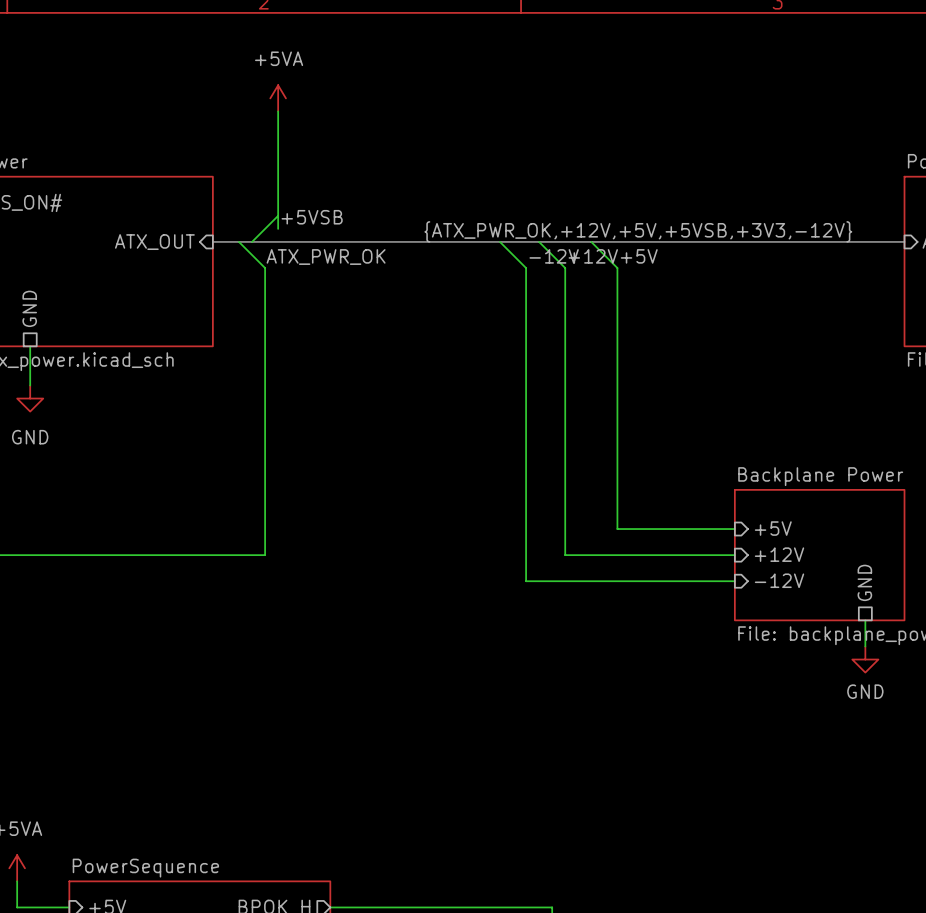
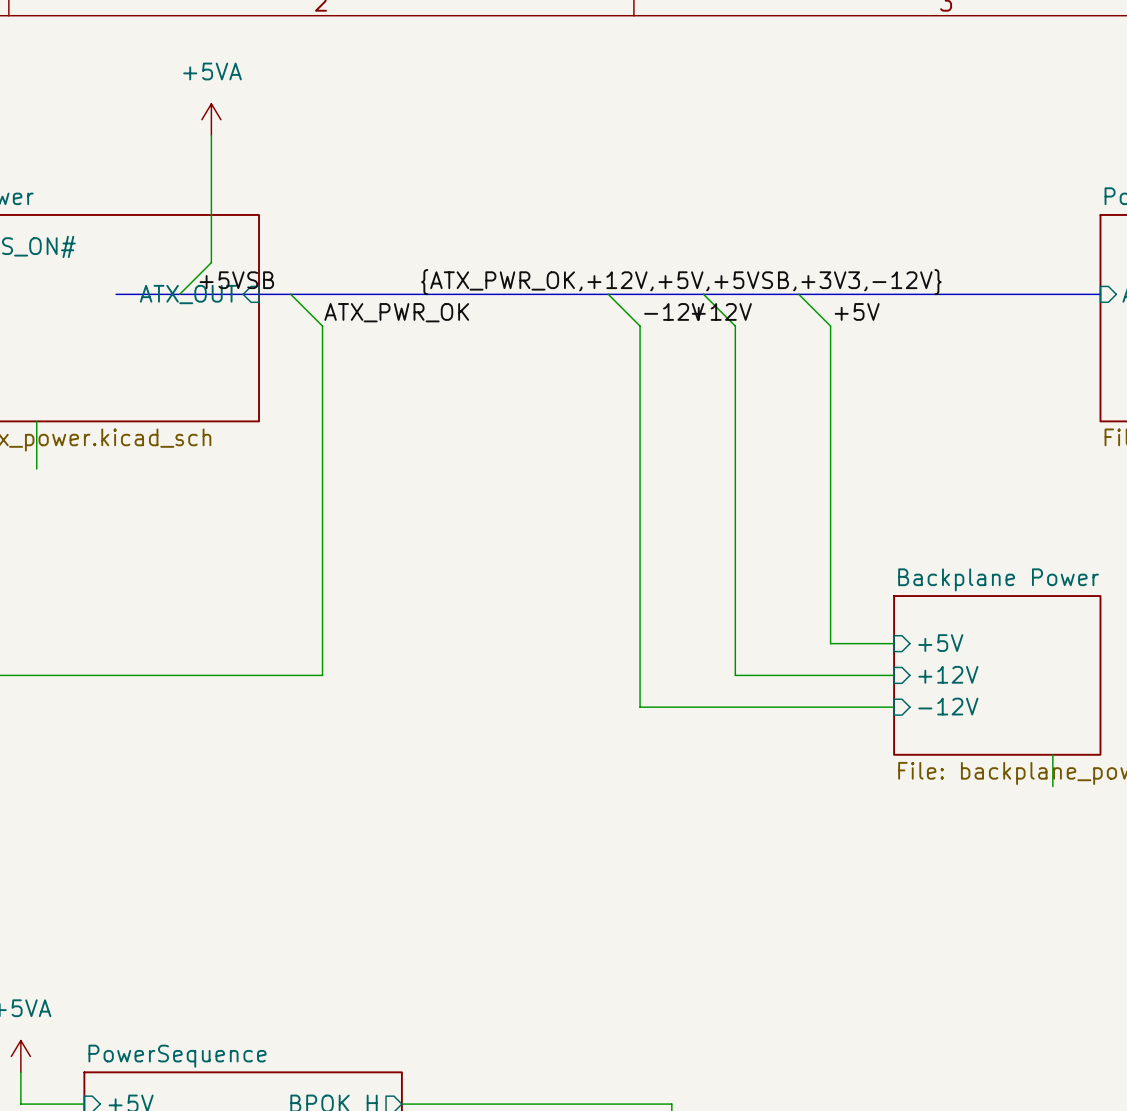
power symbol position: +5VA (278, 98) -> +5VA (211, 119)
wire: none -> (211, 135) (211, 262) (179, 294)
wire: (278, 111) (278, 228) -> none
wire: (278, 215) (252, 241) -> none
label position: +5VSB (312, 217) -> +5VSB (236, 280)
label position: {ATX_PWR_OK,+12V,+5V,+5VSB,+3V3,-12V} (638, 231) -> {ATX_PWR_OK,+12V,+5V,+5VSB,+3V3,-12V} (681, 282)
bus: none -> (116, 294) (259, 294)
wire: (539, 241) (565, 268) (565, 555) (604, 555) -> (703, 294) (735, 326) (735, 675)
wire: (591, 241) (617, 268) (617, 529) (682, 529) -> (798, 294) (830, 326) (830, 643)
label position: +5V (639, 256) -> +5V (857, 311)
sheet pin: GND (29, 308) -> none
power symbol: GND (30, 398) -> none
sheet pin: GND (864, 582) -> none
power symbol: GND (865, 659) -> none

